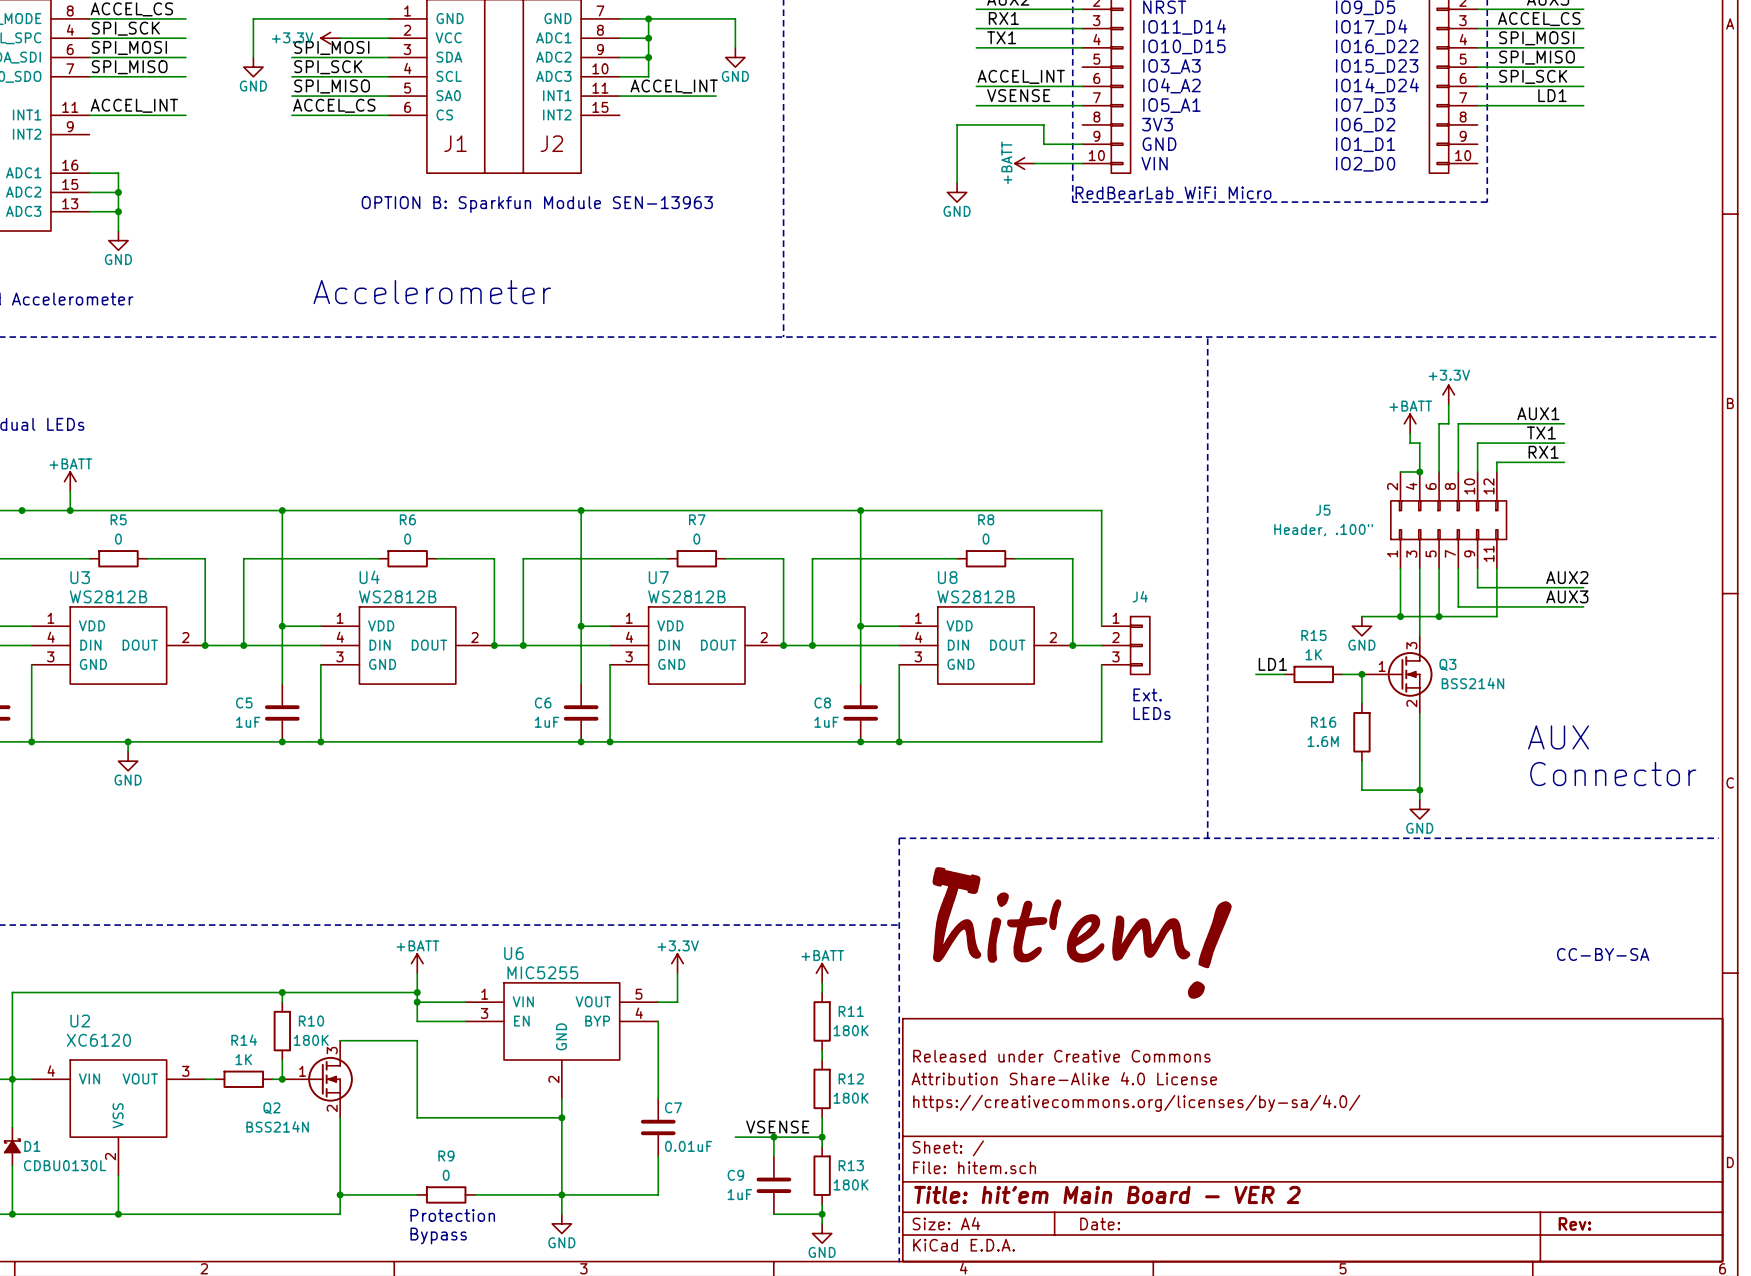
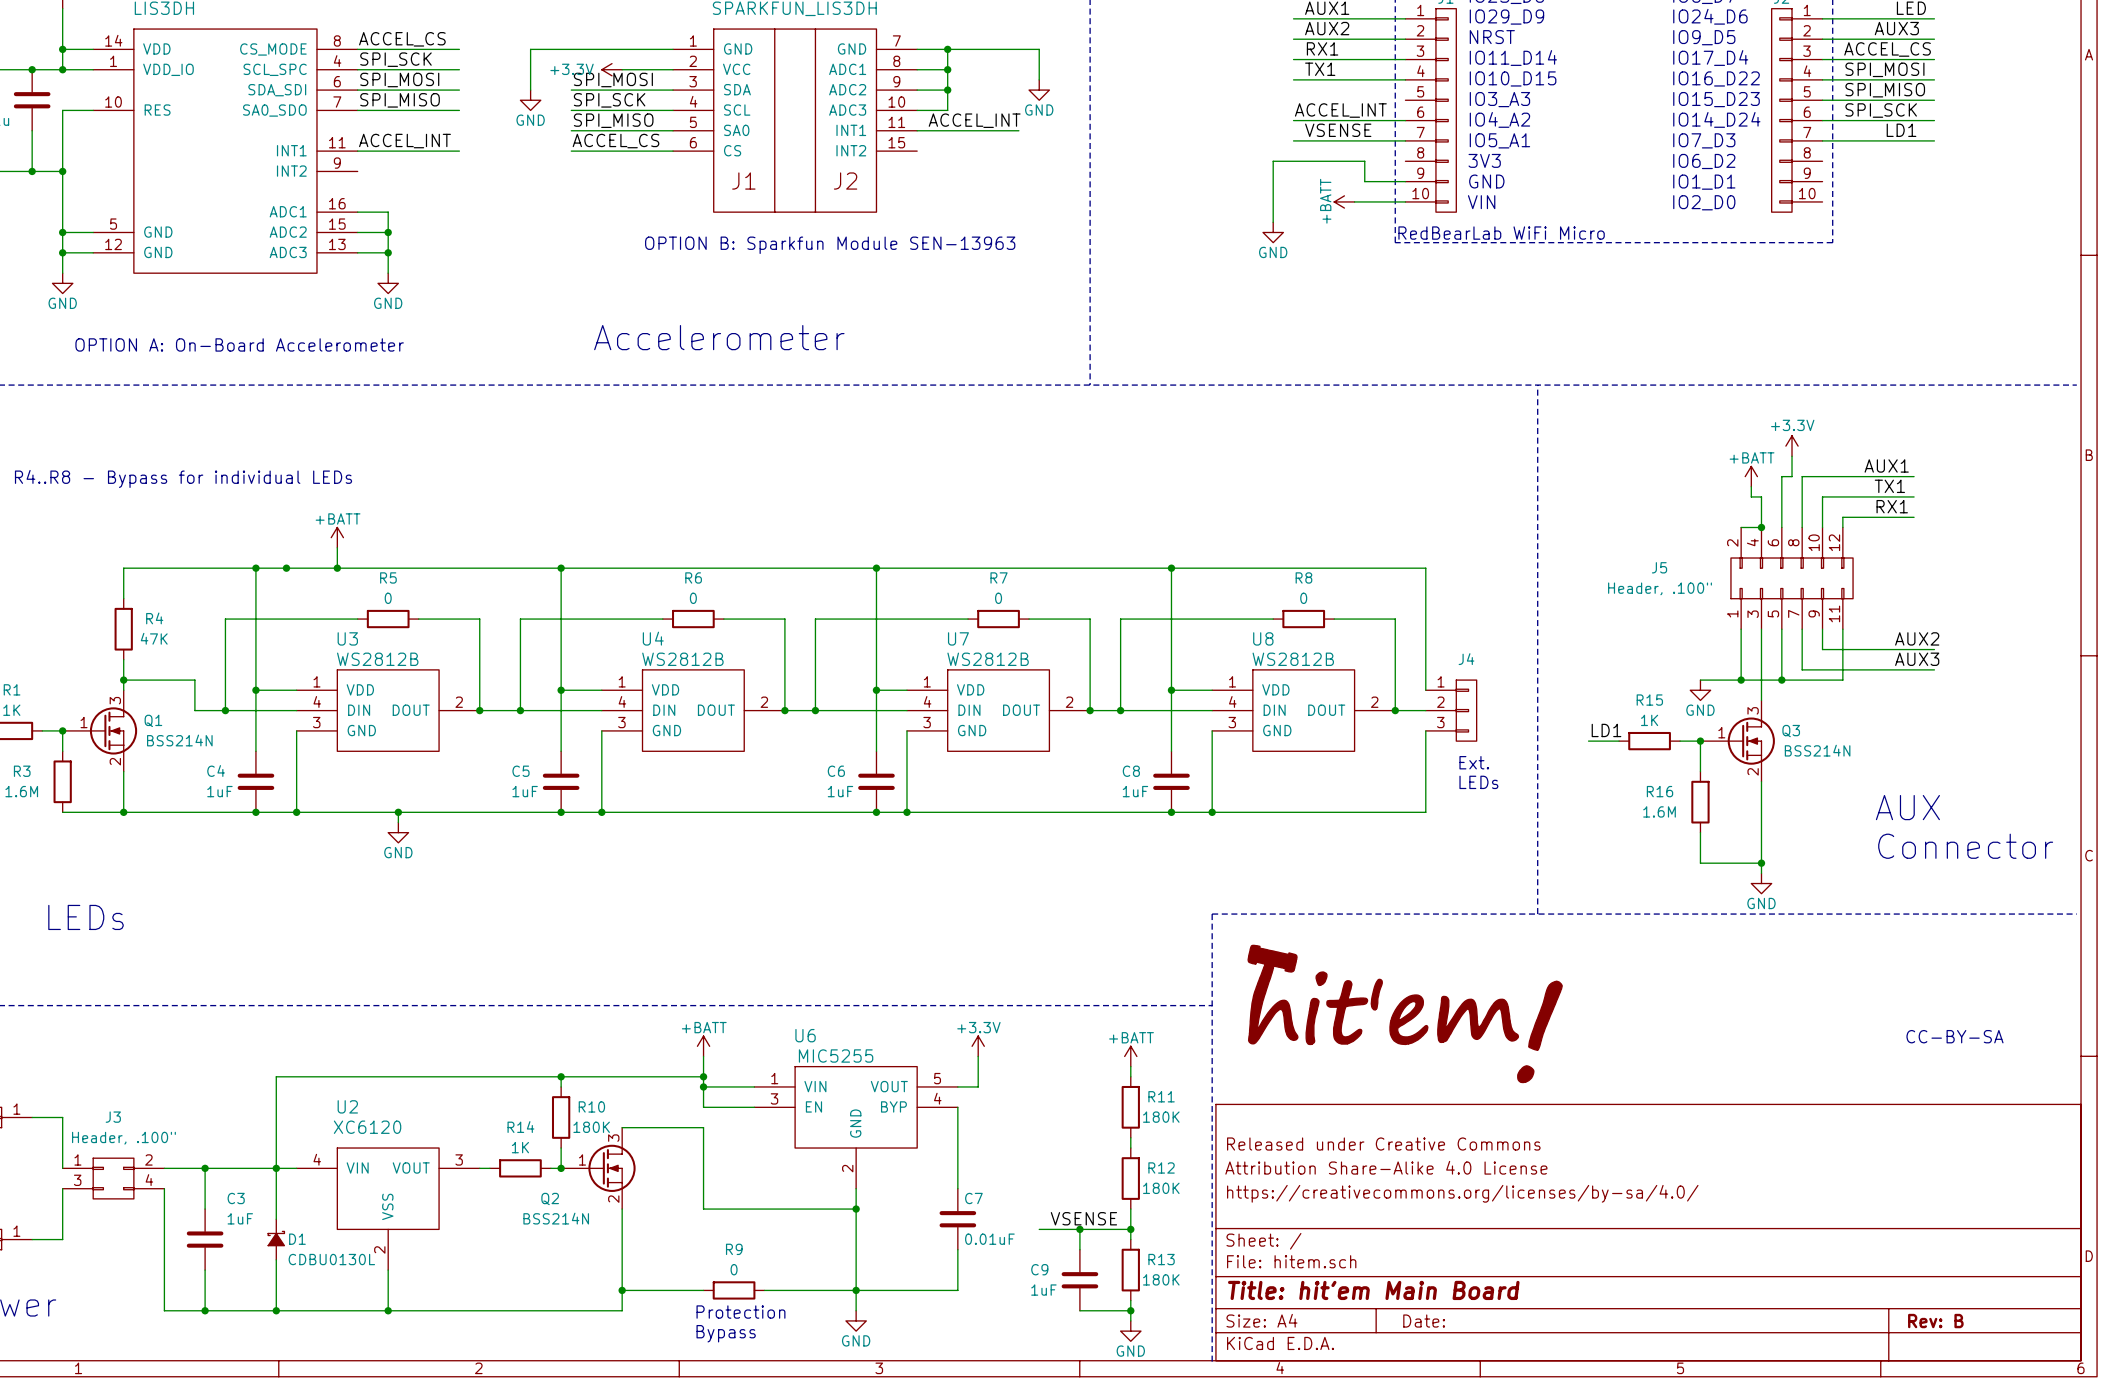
title block: Title: hit'em Main Board - VER 2 (1107, 1194) -> Title: hit'em Main Board (1373, 1290)
title block: Rev: (1574, 1223) -> Rev: B (1935, 1321)

